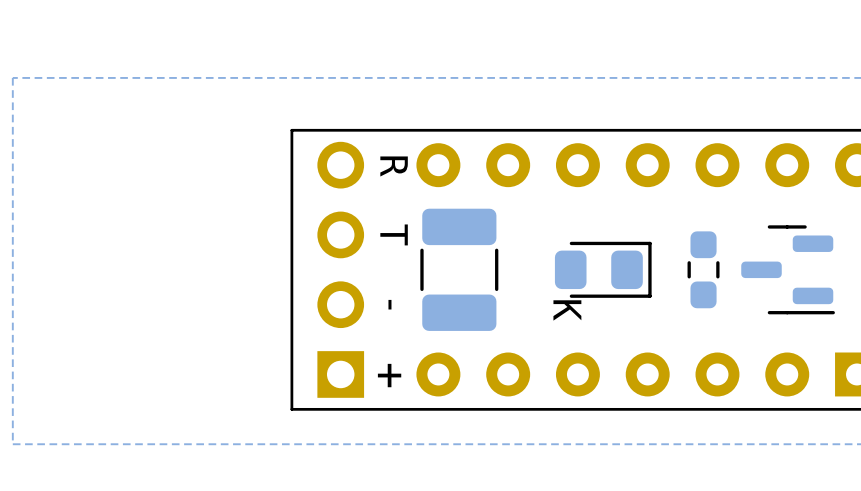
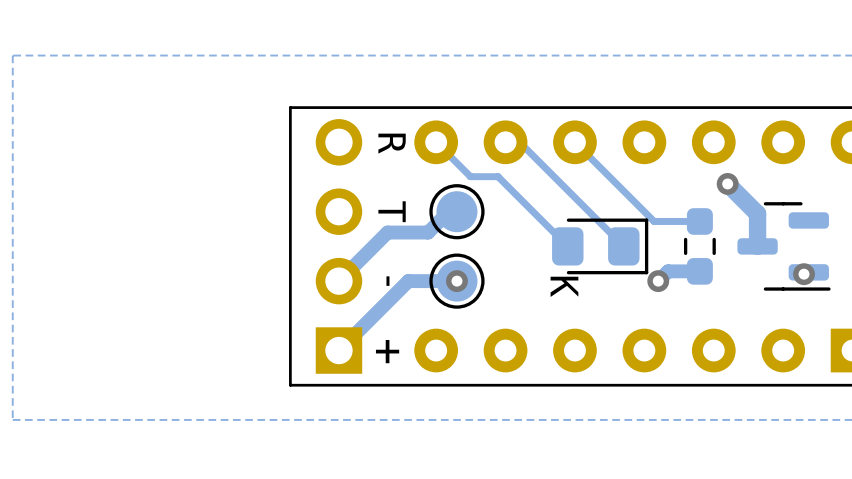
track: none -> (436, 142) (470, 176) (498, 176) (567, 246)
track: none -> (505, 142) (519, 142) (623, 246)
track: none -> (574, 142) (654, 221) (699, 221)
track: none -> (727, 183) (757, 213) (757, 246) (769, 246)
via: none -> (727, 183)
track: none -> (456, 203) (428, 232) (387, 232) (338, 281)
part: none -> (456, 211)
part: (459, 269) -> none
track: none -> (699, 271) (668, 271) (658, 281)
via: none -> (804, 274)
part: none -> (456, 281)
via: none -> (456, 281)
via: none -> (658, 281)
track: none -> (456, 289) (456, 281) (408, 281) (338, 350)

